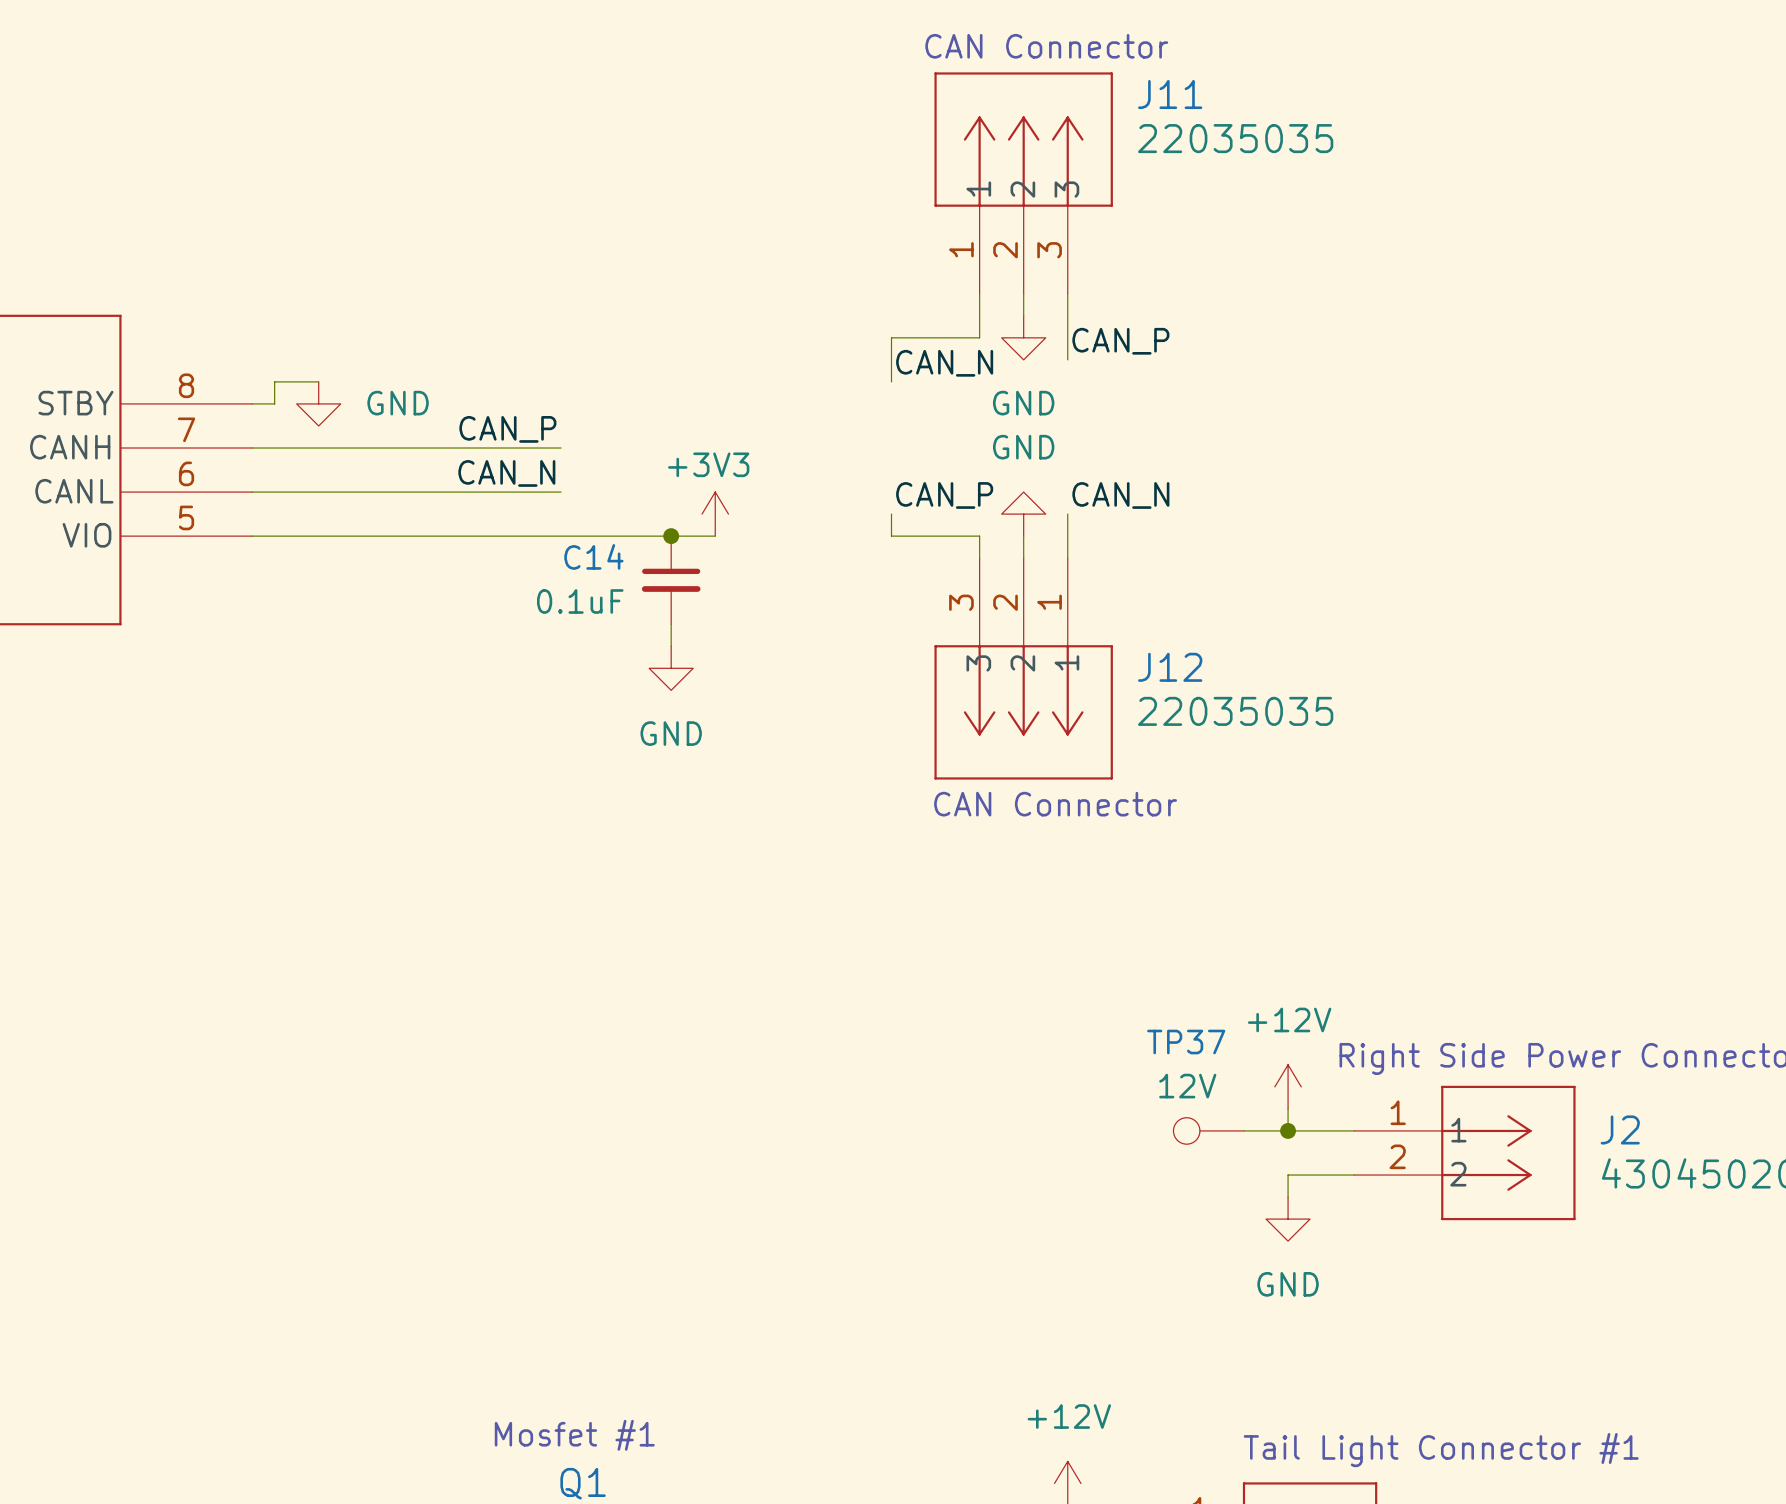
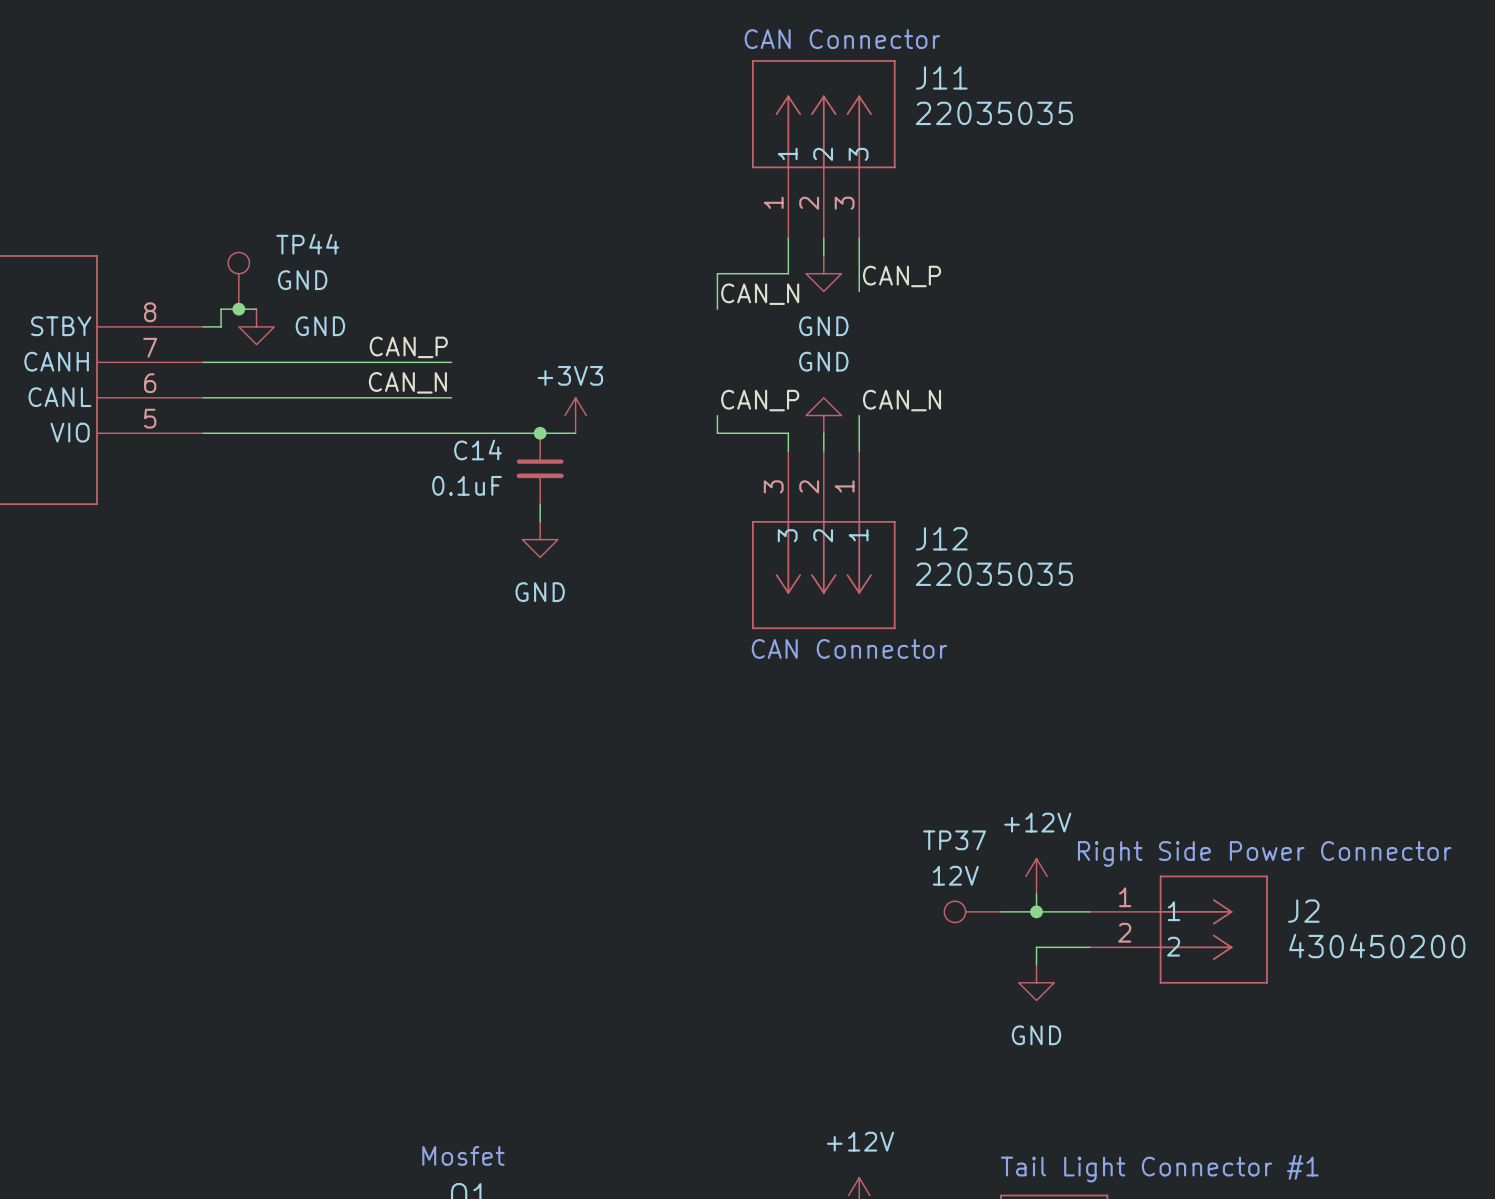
TP44: none -> GND (238, 280)
junction: none -> (238, 309)
text: Mosfet #1 (574, 1435) -> Mosfet (463, 1155)

